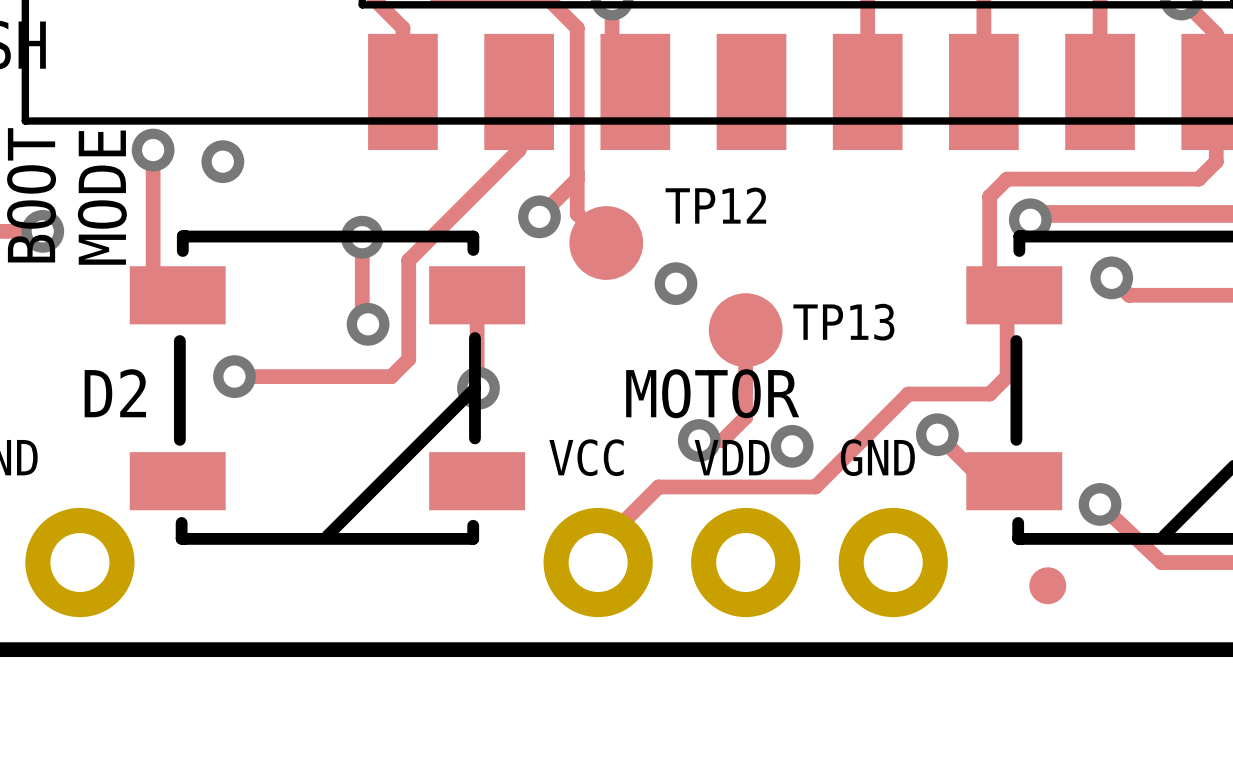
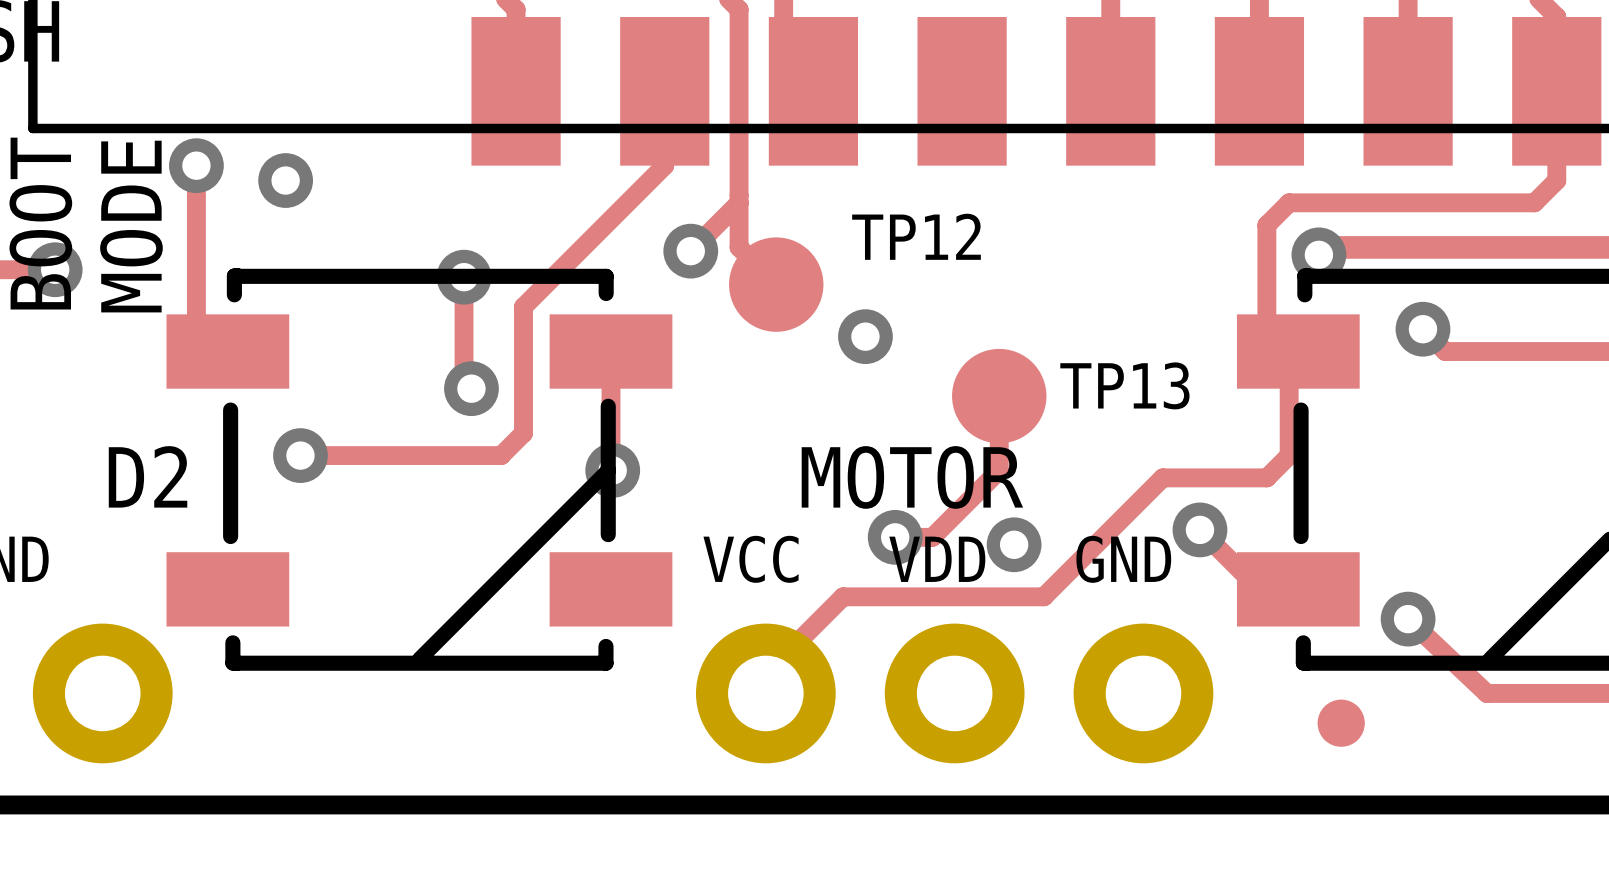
text position: TP13 (843, 322) -> TP13 (1124, 385)
track: (745, 330) (745, 417) (722, 440) -> (999, 396) (999, 470) (932, 537) (924, 537)
part position: (745, 330) -> (999, 396)

